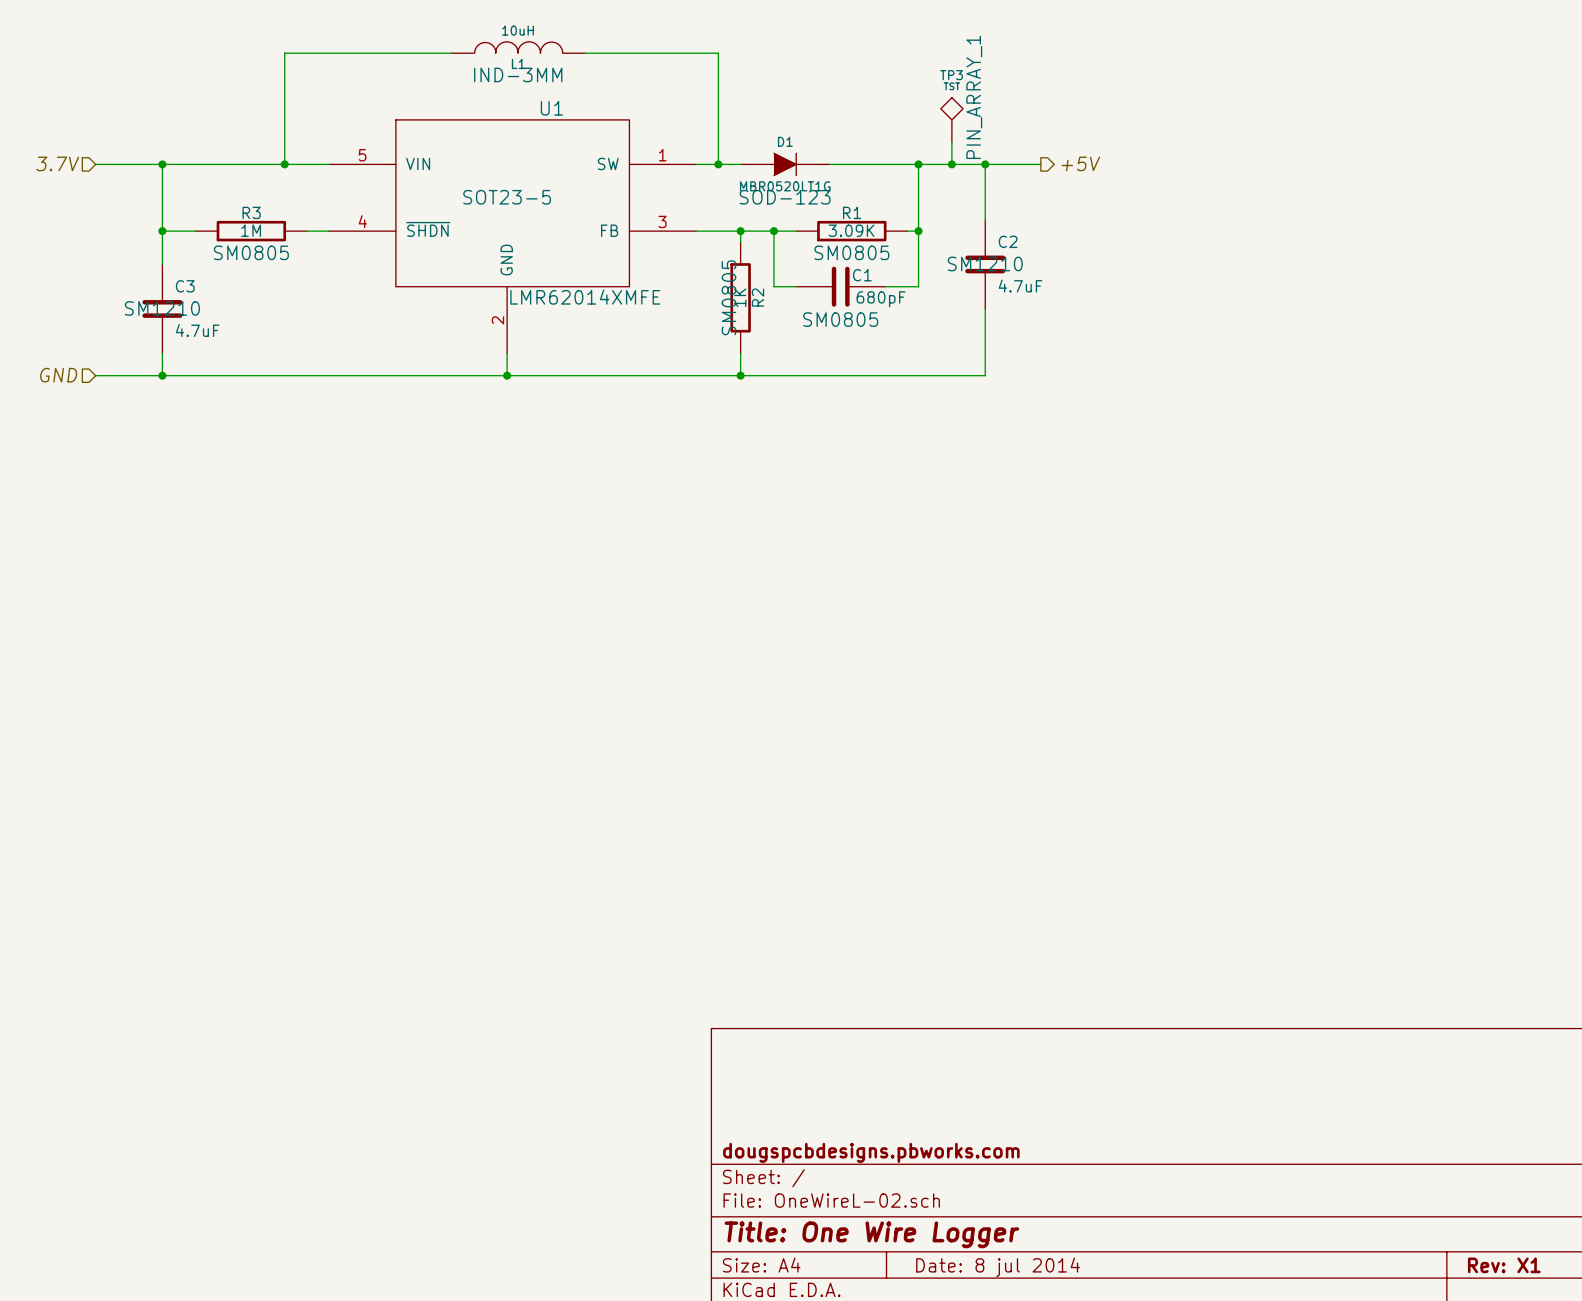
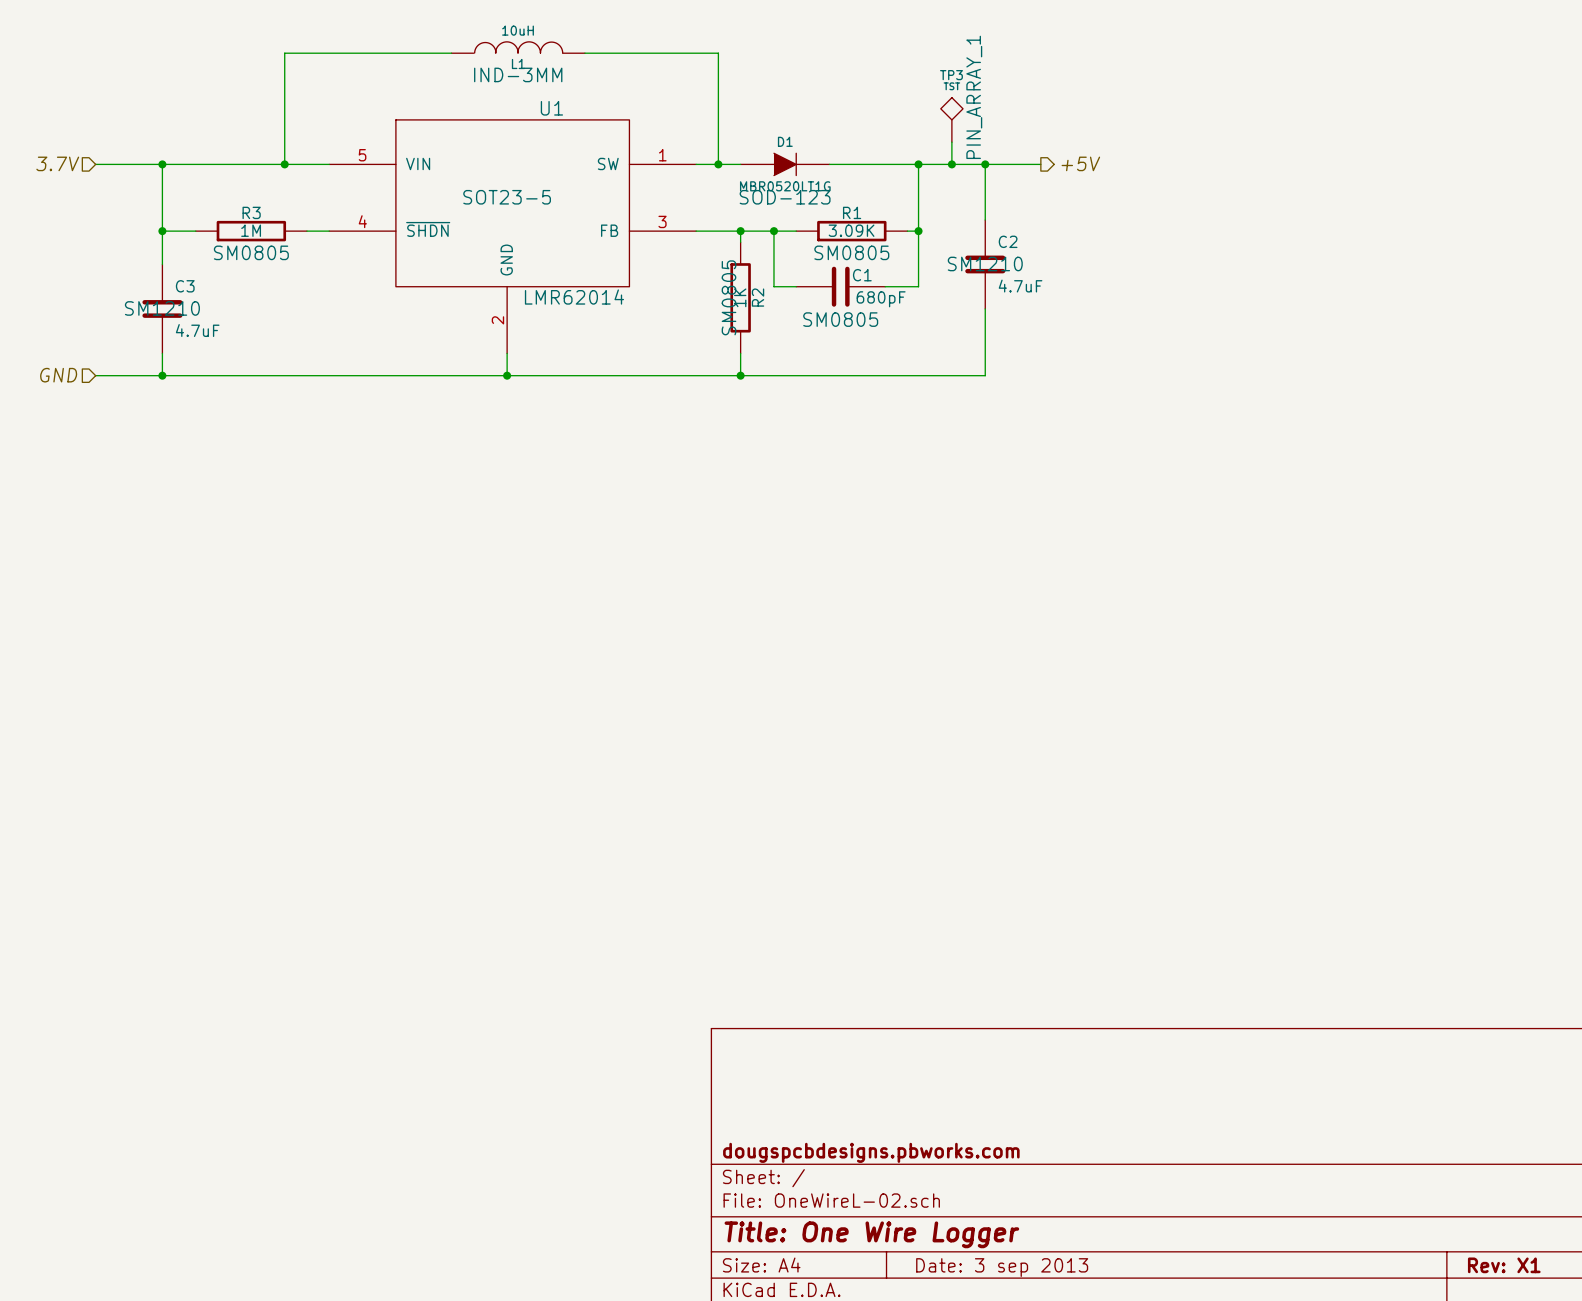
U1 value: LMR62014XMFE (585, 297) -> LMR62014 (574, 297)
title block: Date: 8 jul 2014 (998, 1267) -> Date: 3 sep 2013 (1002, 1267)

